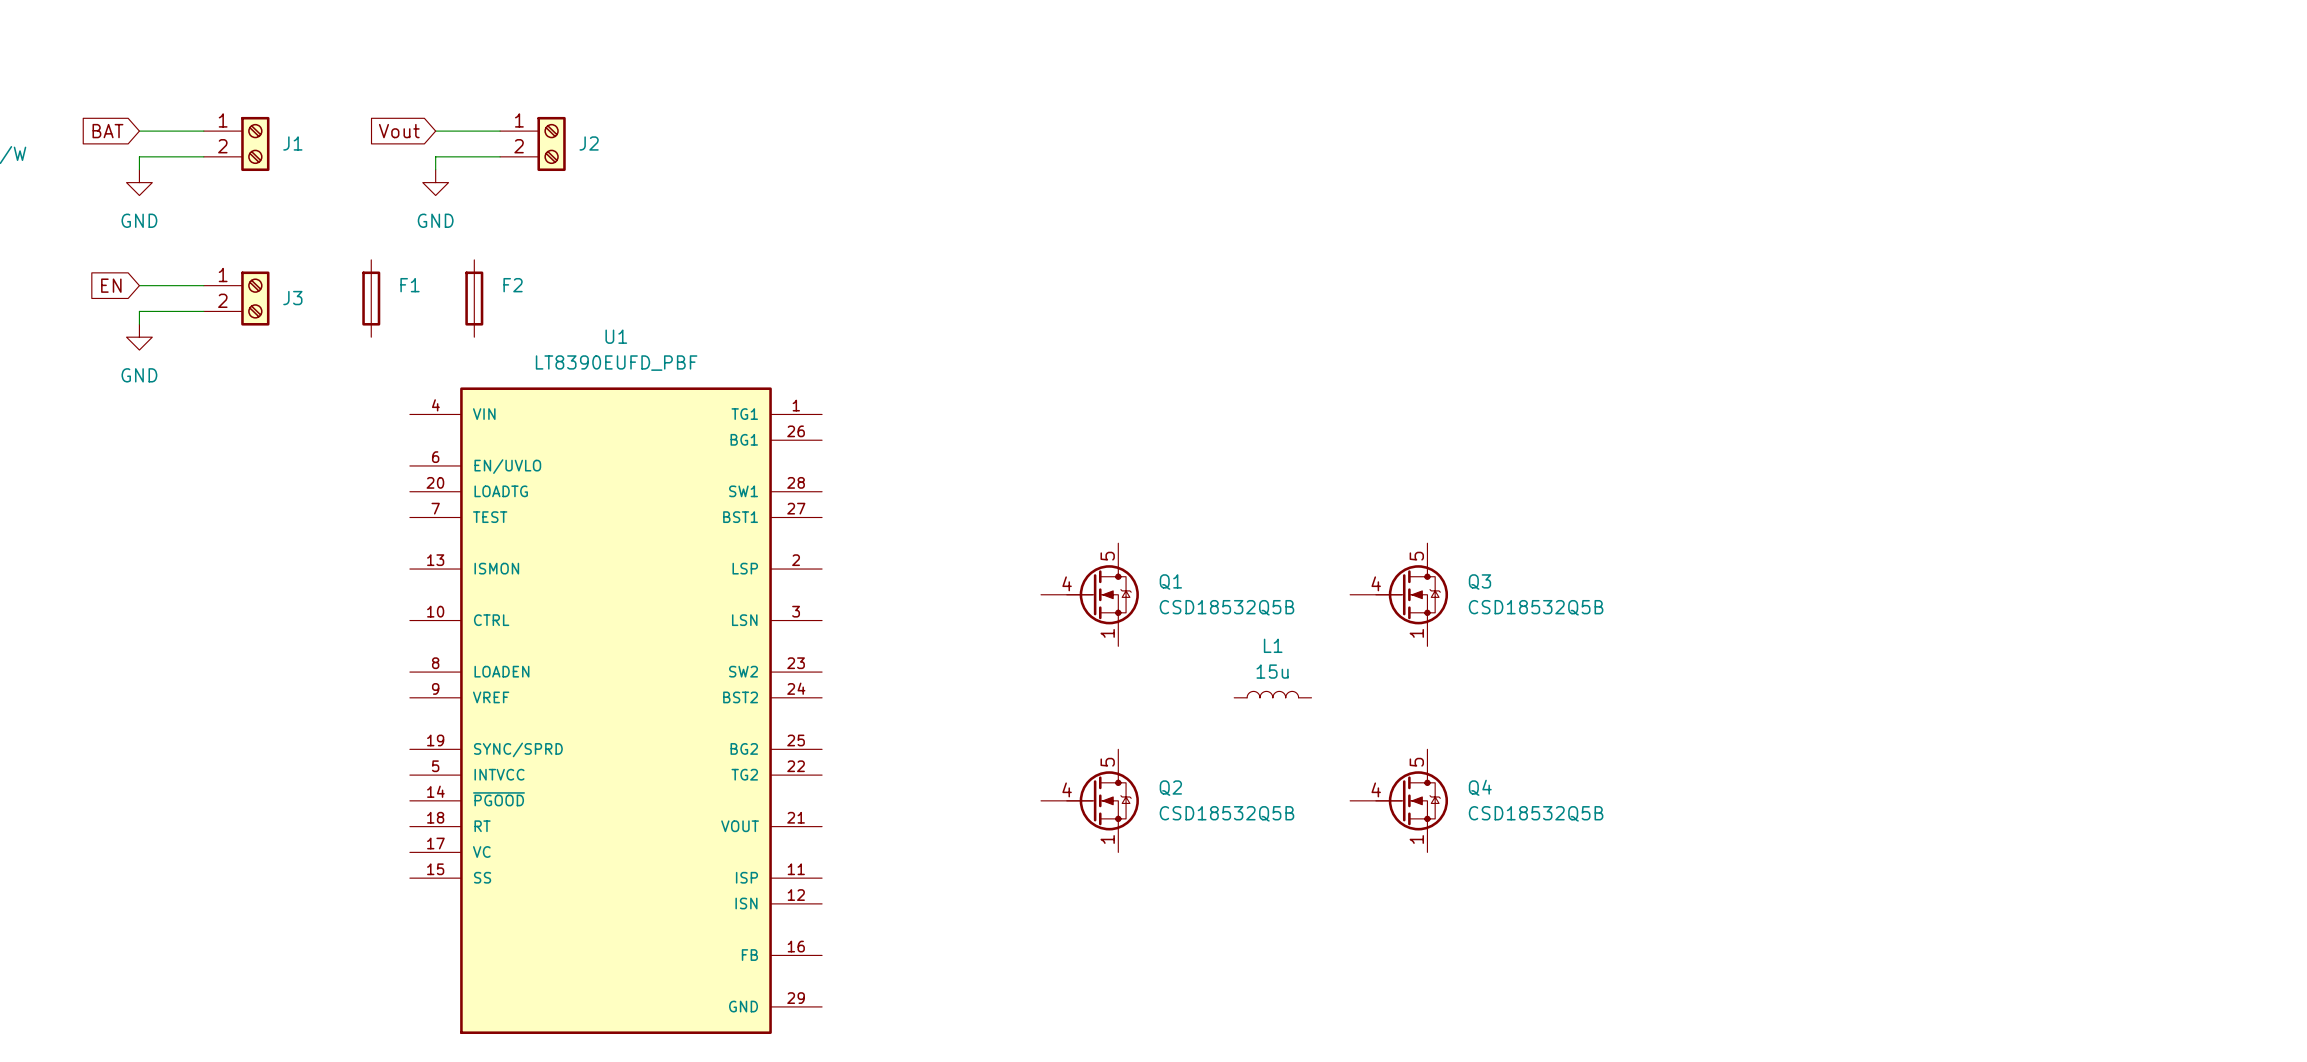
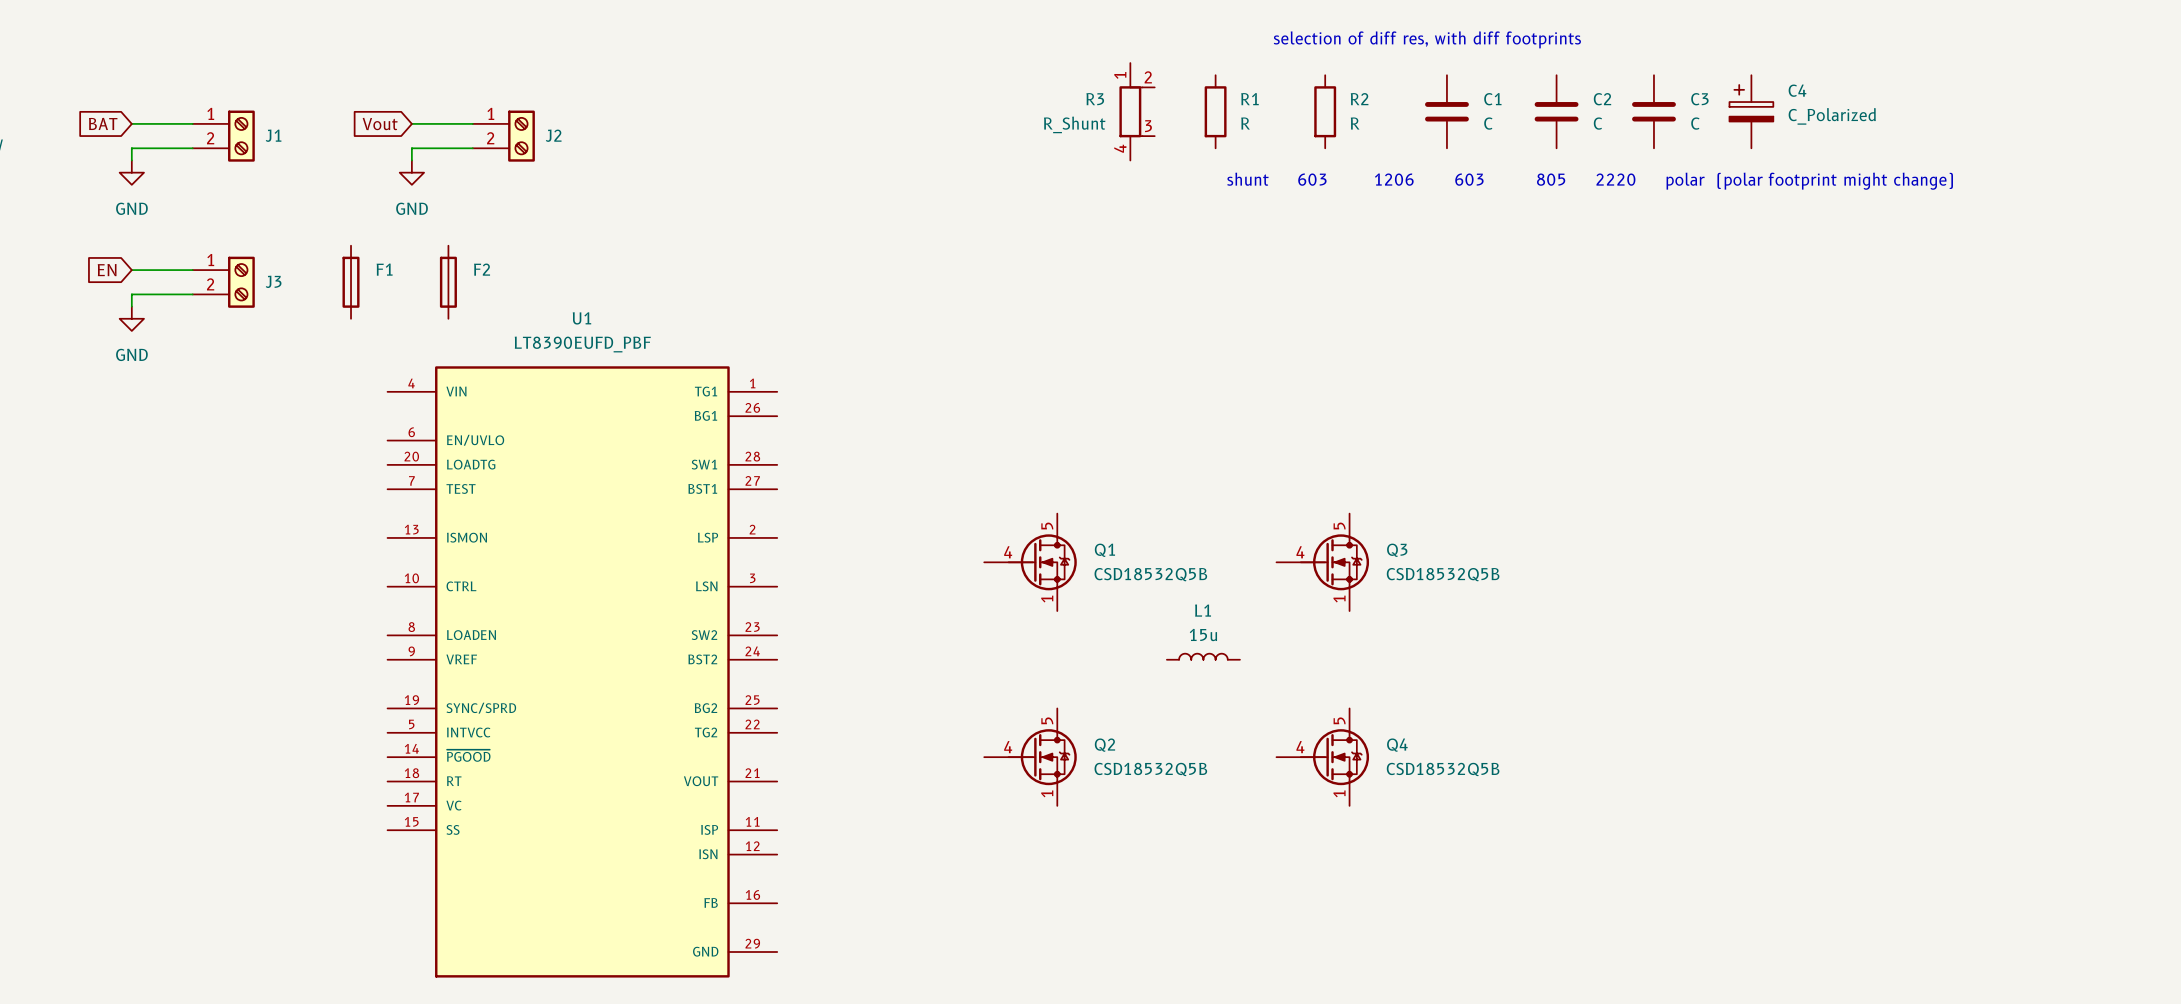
text: none -> selection of diff res, with diff footprints (1427, 39)
R3: none -> R_Shunt (1137, 111)
R1: none -> R (1215, 111)
R2: none -> R (1325, 111)
C1: none -> C (1446, 111)
C2: none -> C (1556, 111)
C3: none -> C (1653, 111)
C4: none -> C_Polarized (1751, 111)
text: none -> shunt 603 1206 603 805 2220 polar (polar footprint might change) (1590, 181)

